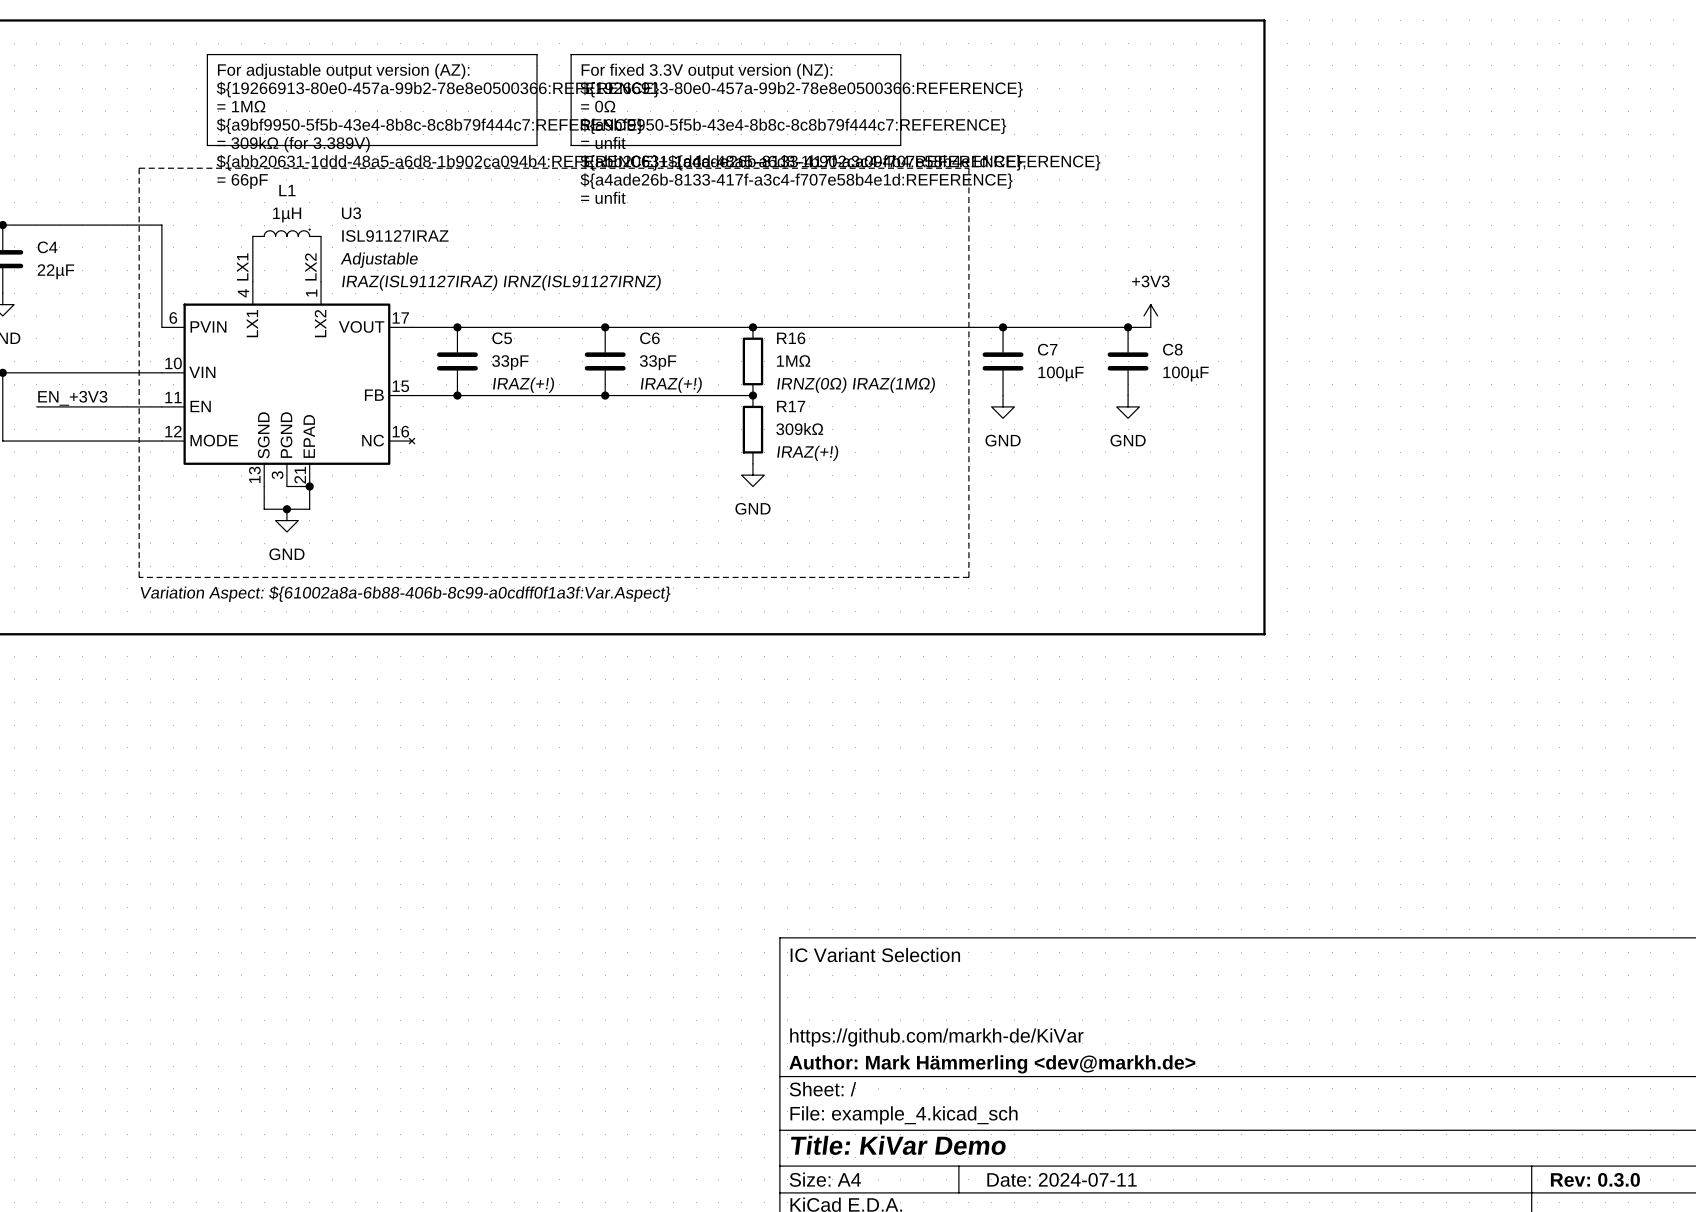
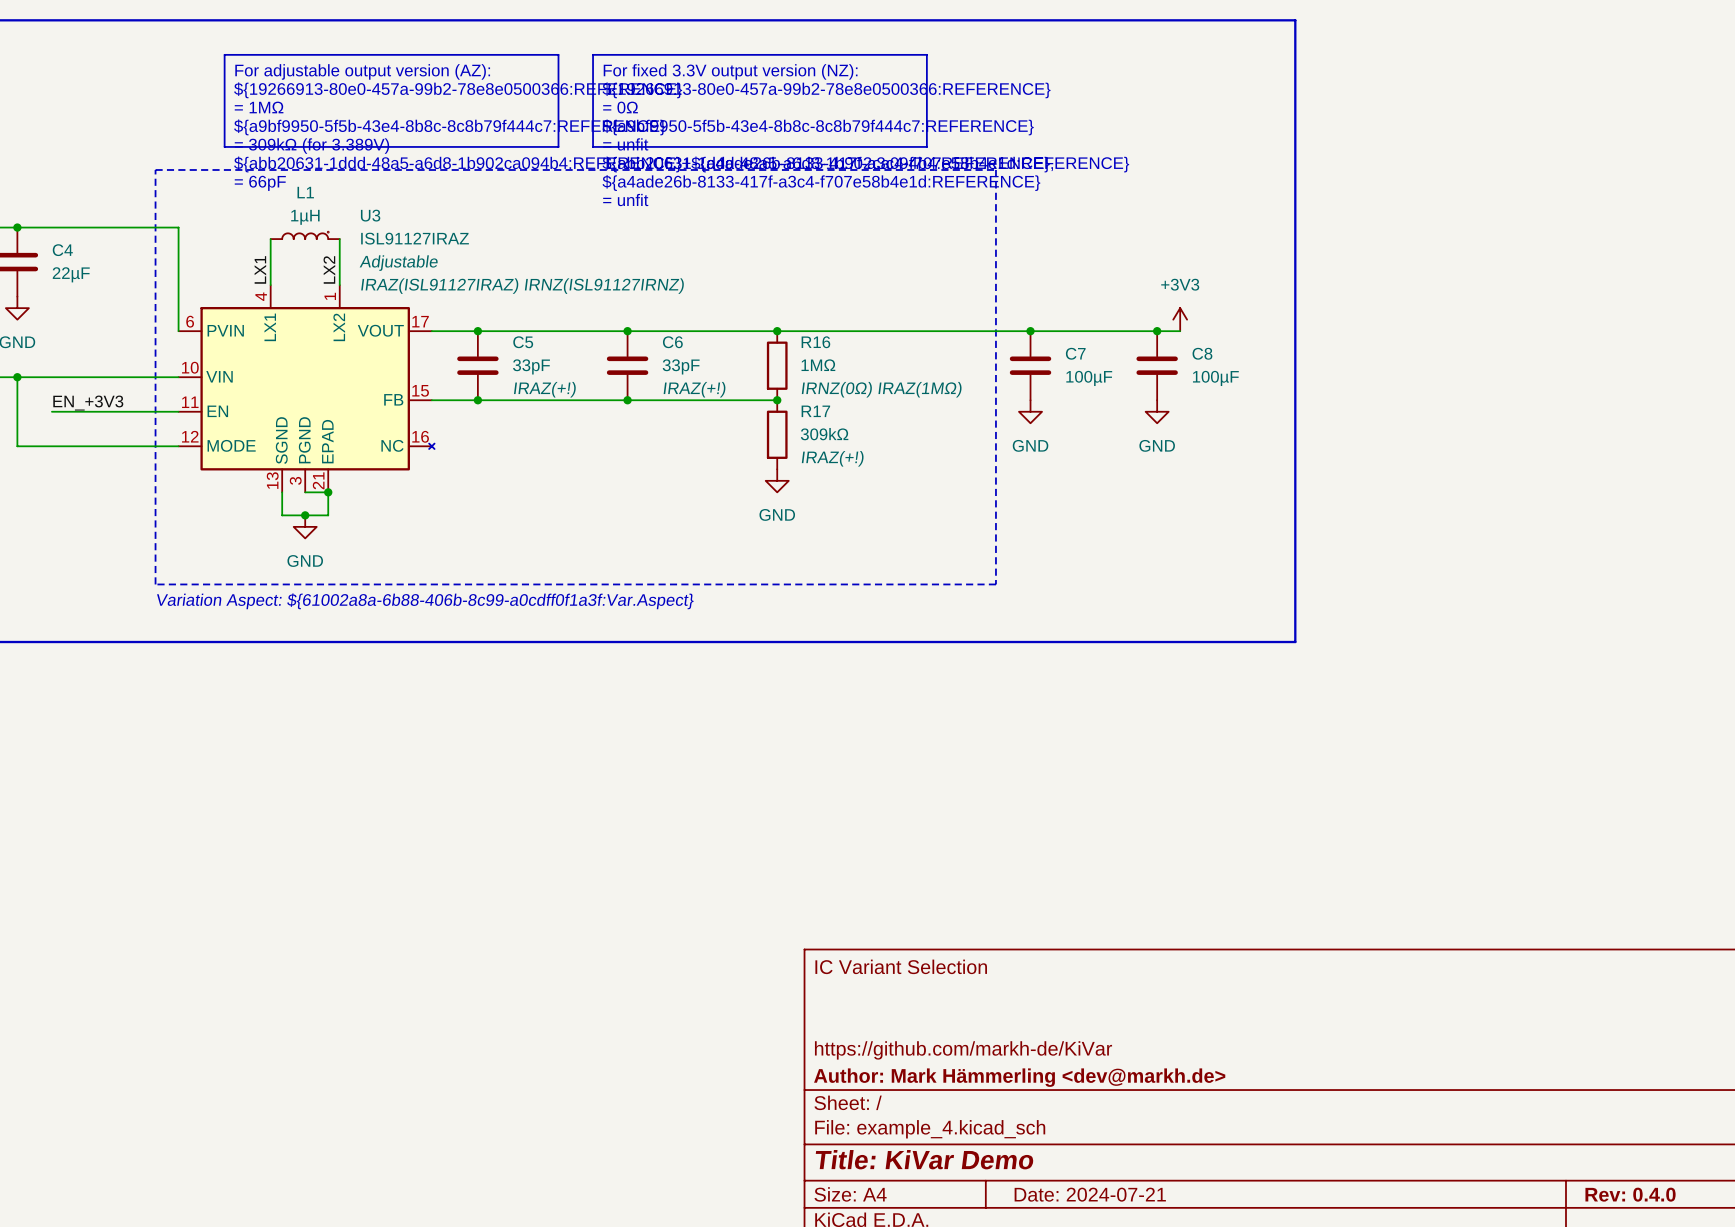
title block: Date: 2024-07-11 (1062, 1179) -> Date: 2024-07-21 (1090, 1194)
title block: Rev: 0.3.0 (1595, 1179) -> Rev: 0.4.0 (1630, 1194)

